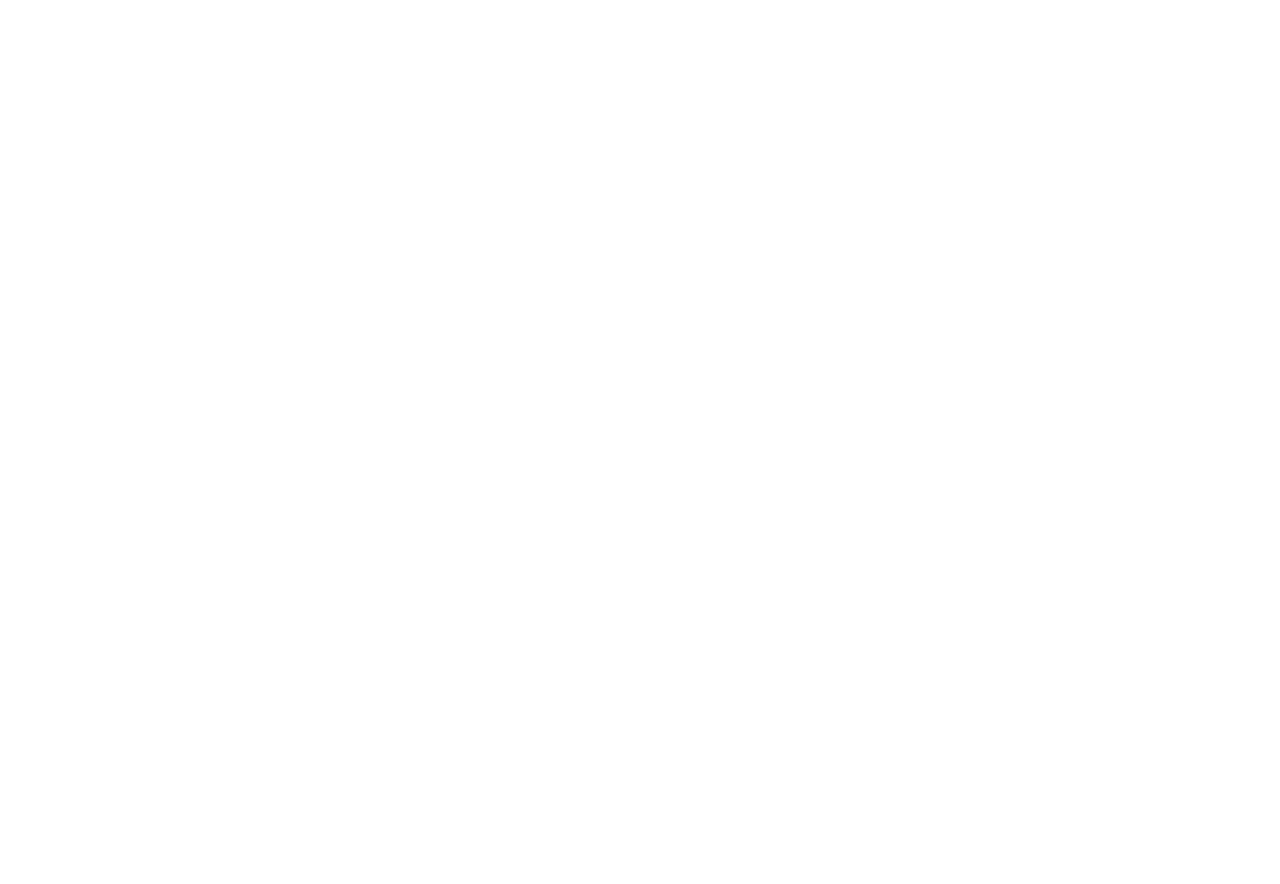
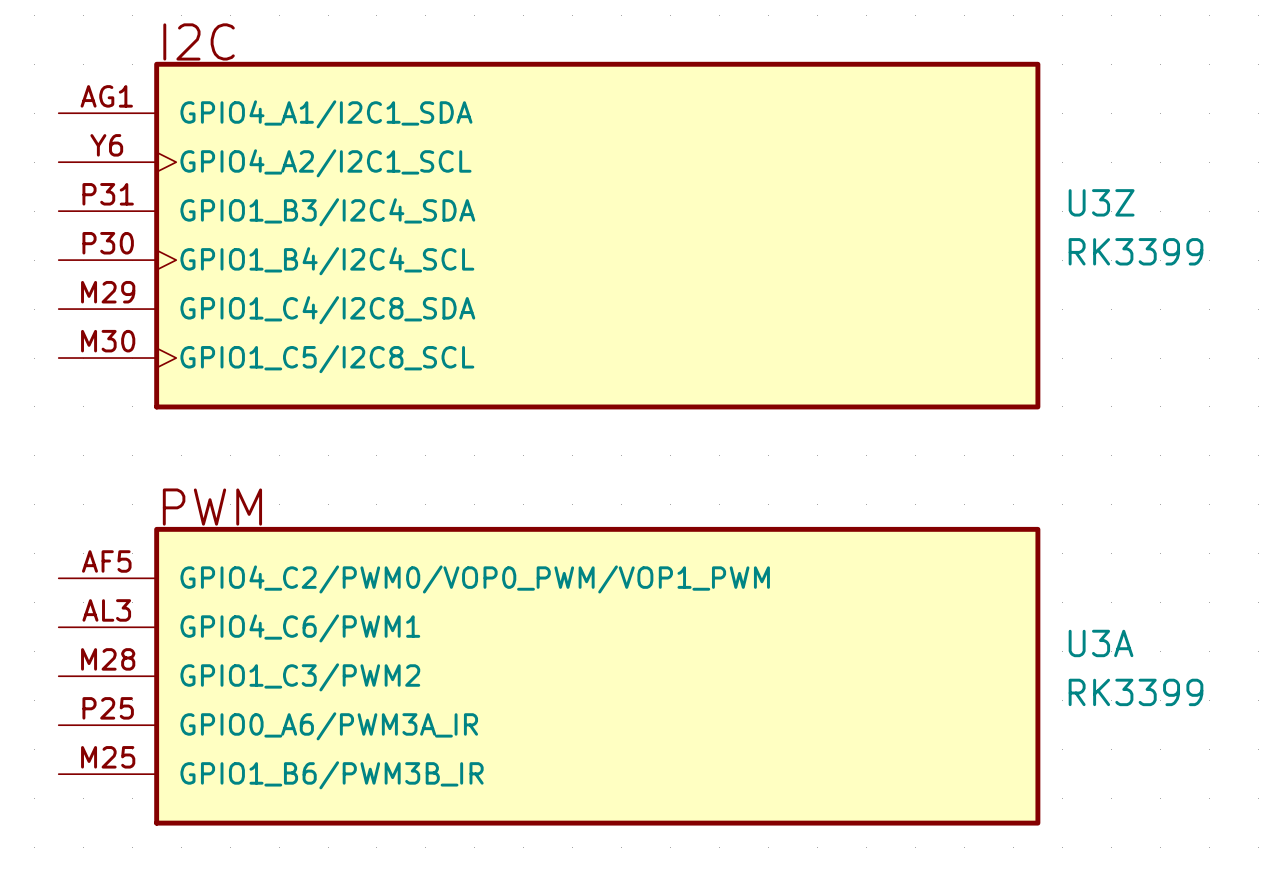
U3Z: none -> RK3399 (549, 235)
U3A: none -> RK3399 (549, 676)

